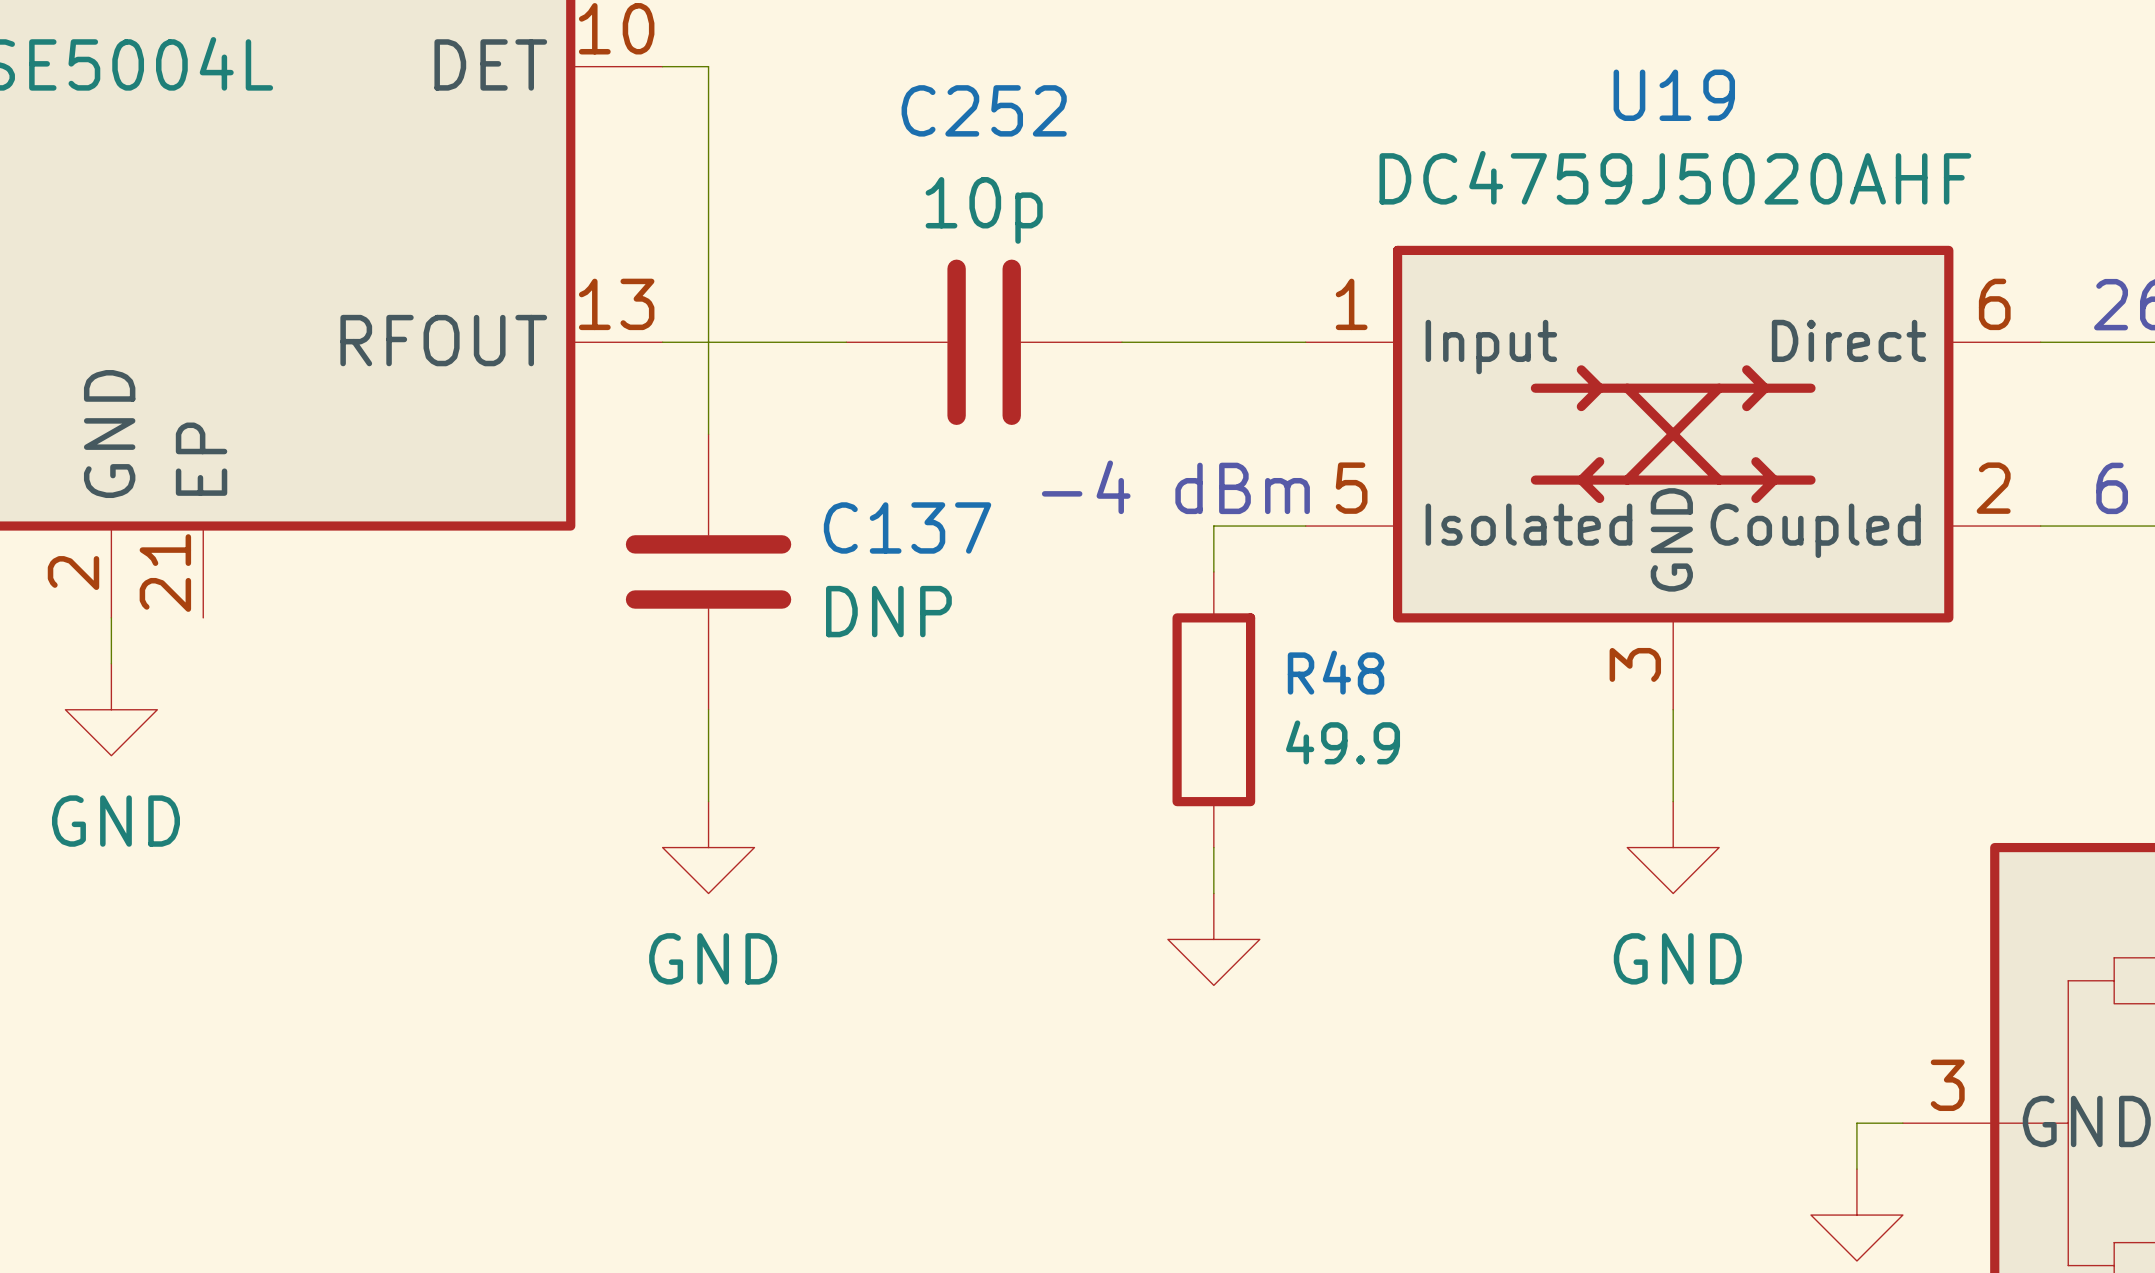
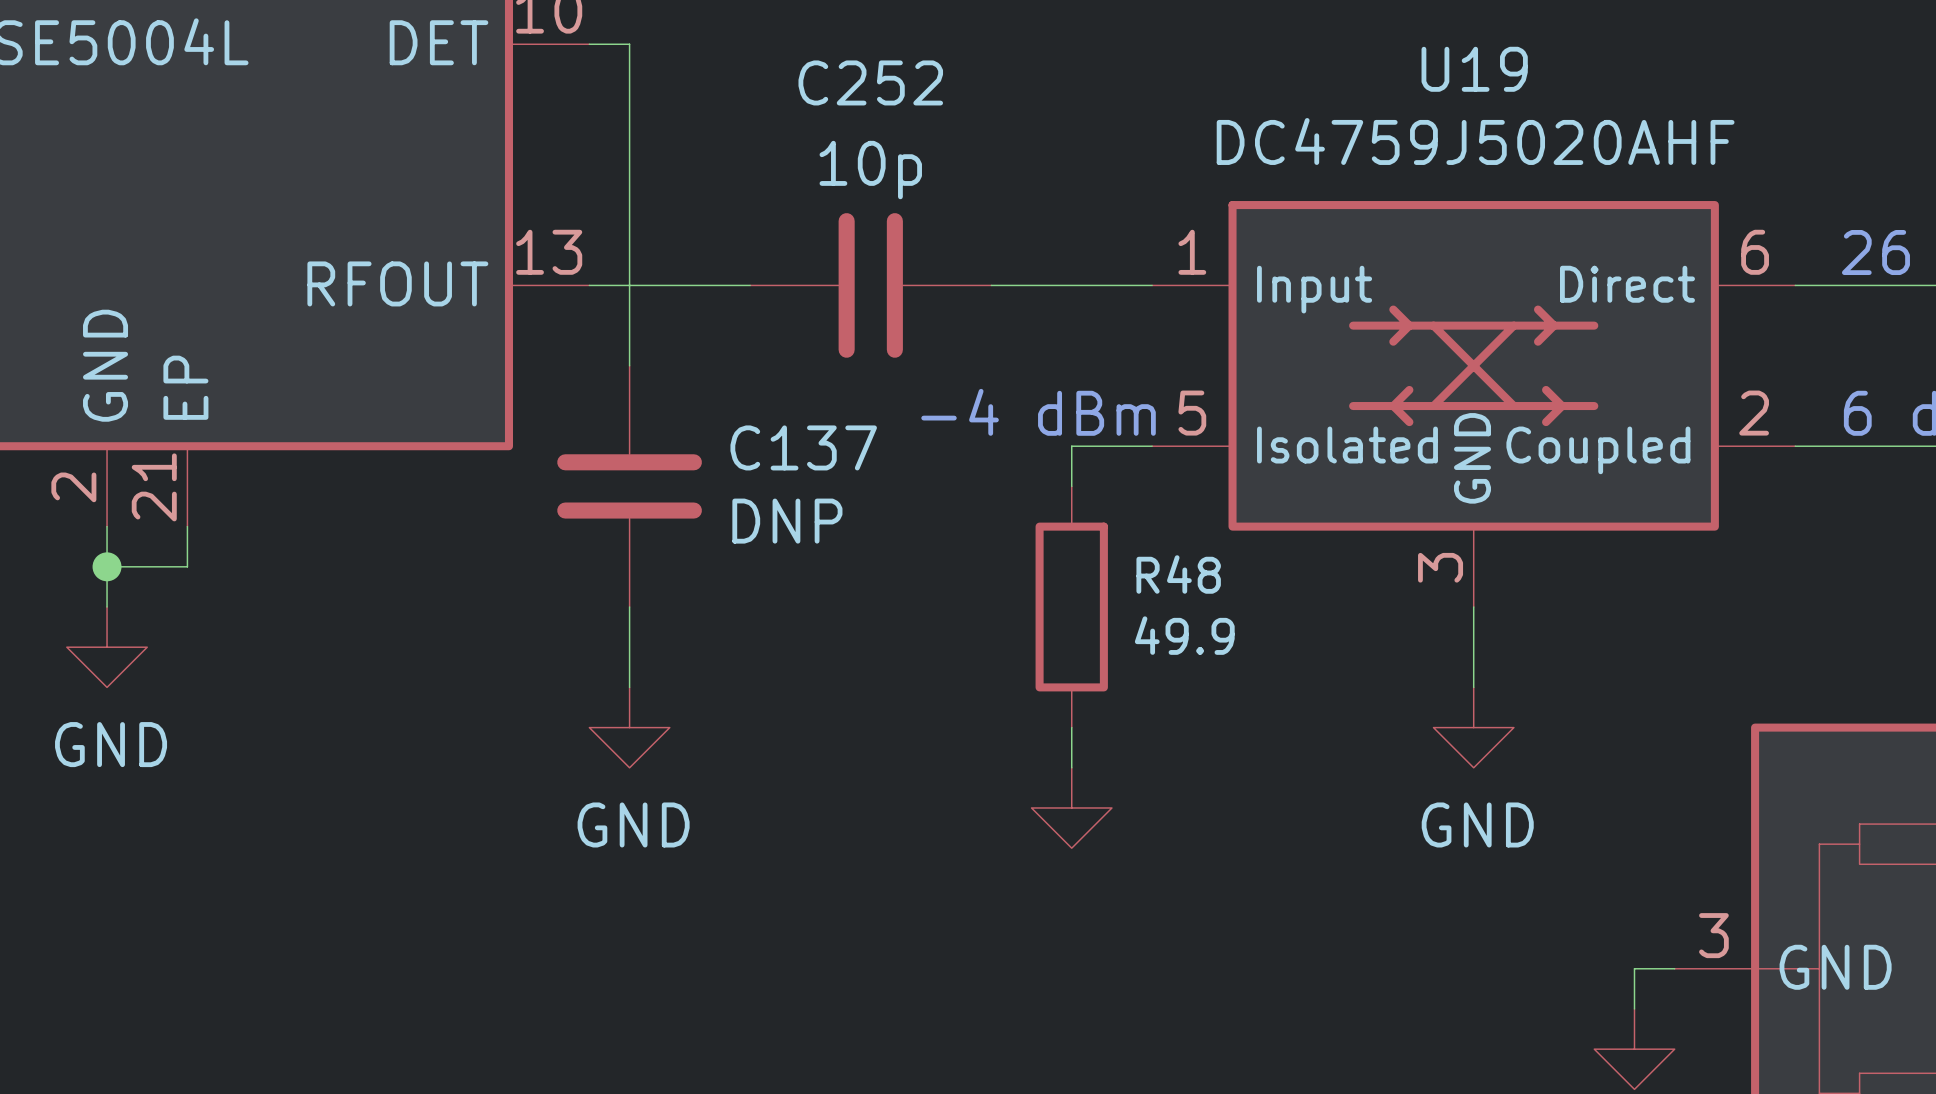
wire: none -> (187, 526) (187, 566) (107, 566) (107, 607)
junction: none -> (107, 566)
power symbol position: GND (111, 709) -> GND (107, 647)

